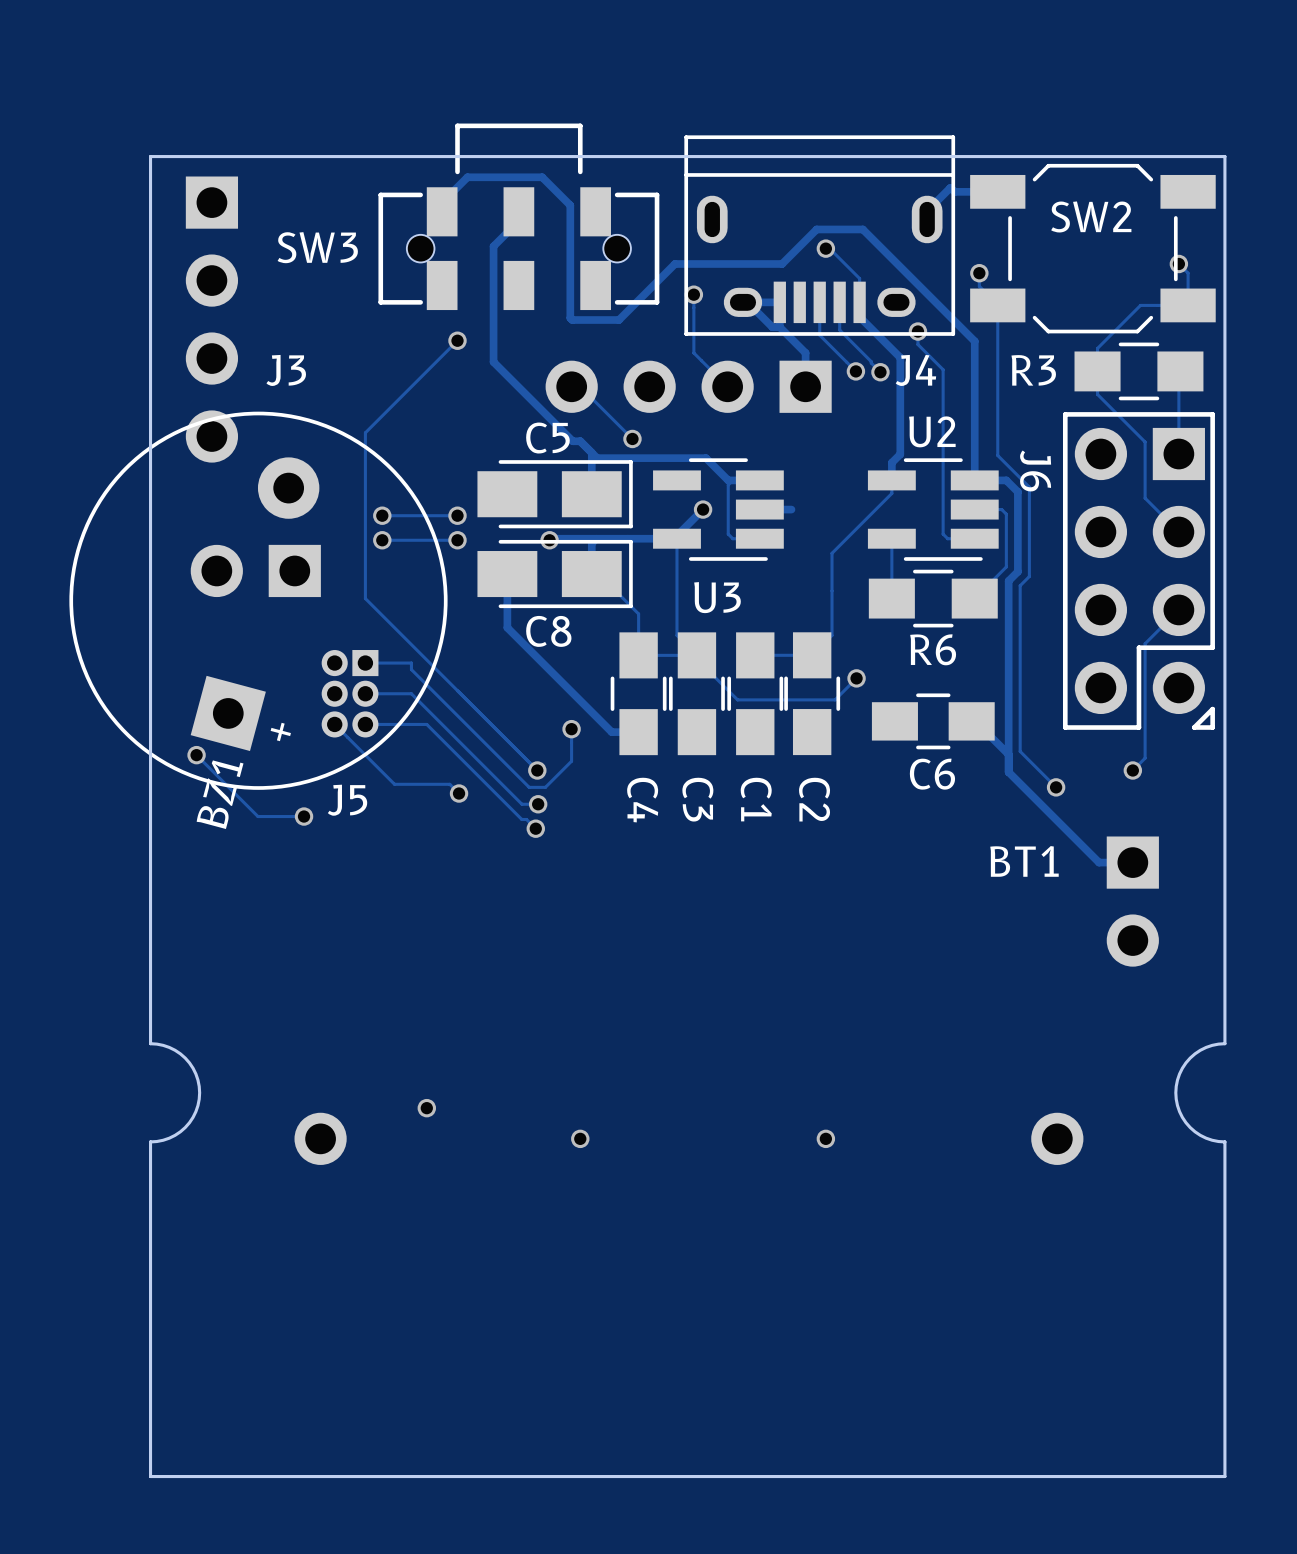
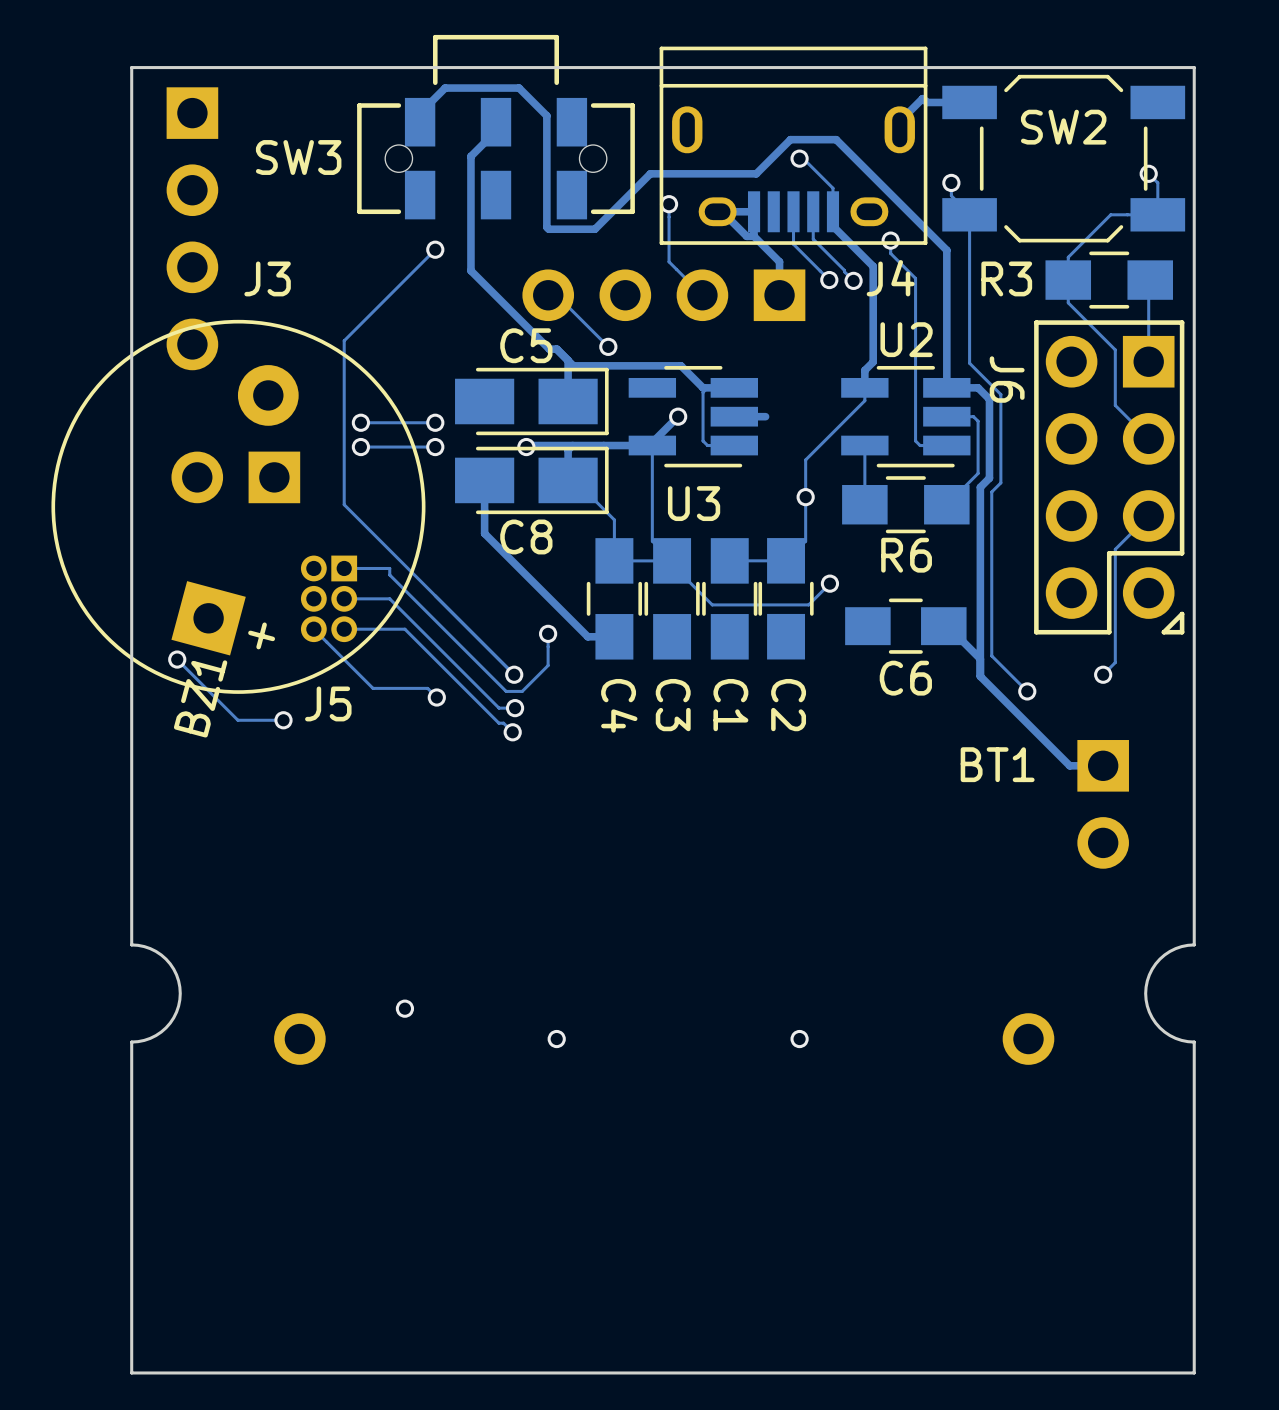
via: none -> (805, 497)

